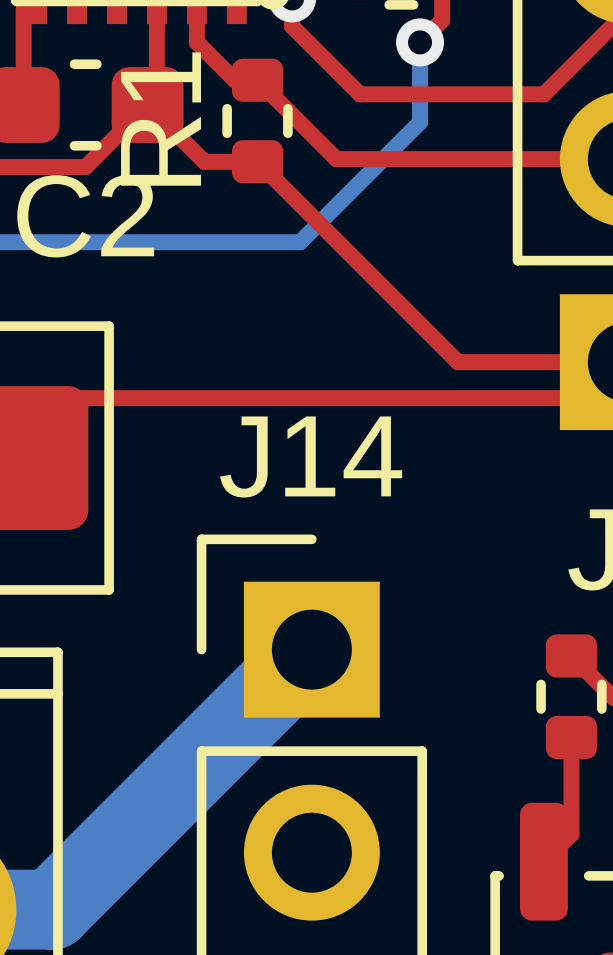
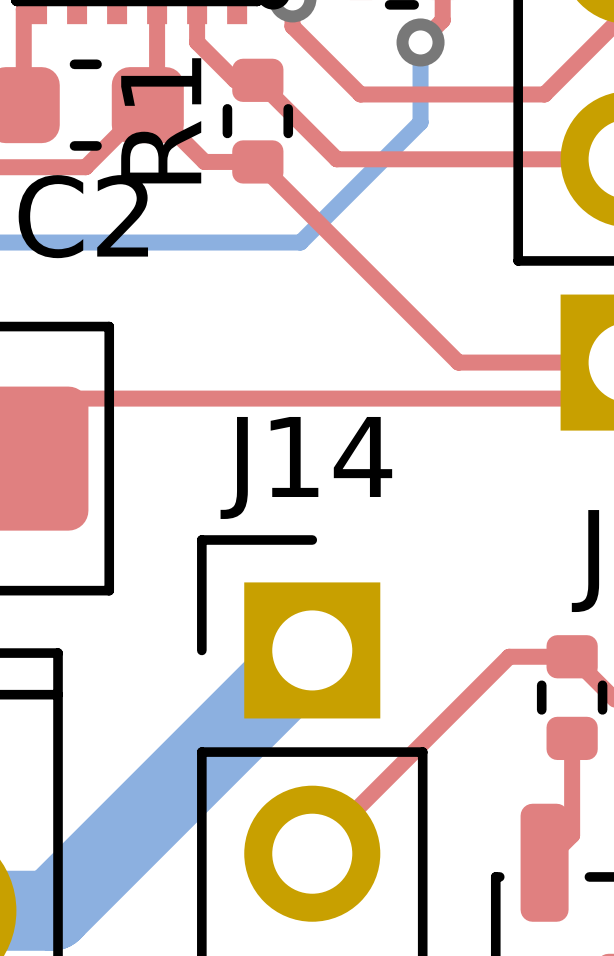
top track: none -> (572, 656) (509, 656) (312, 853)

